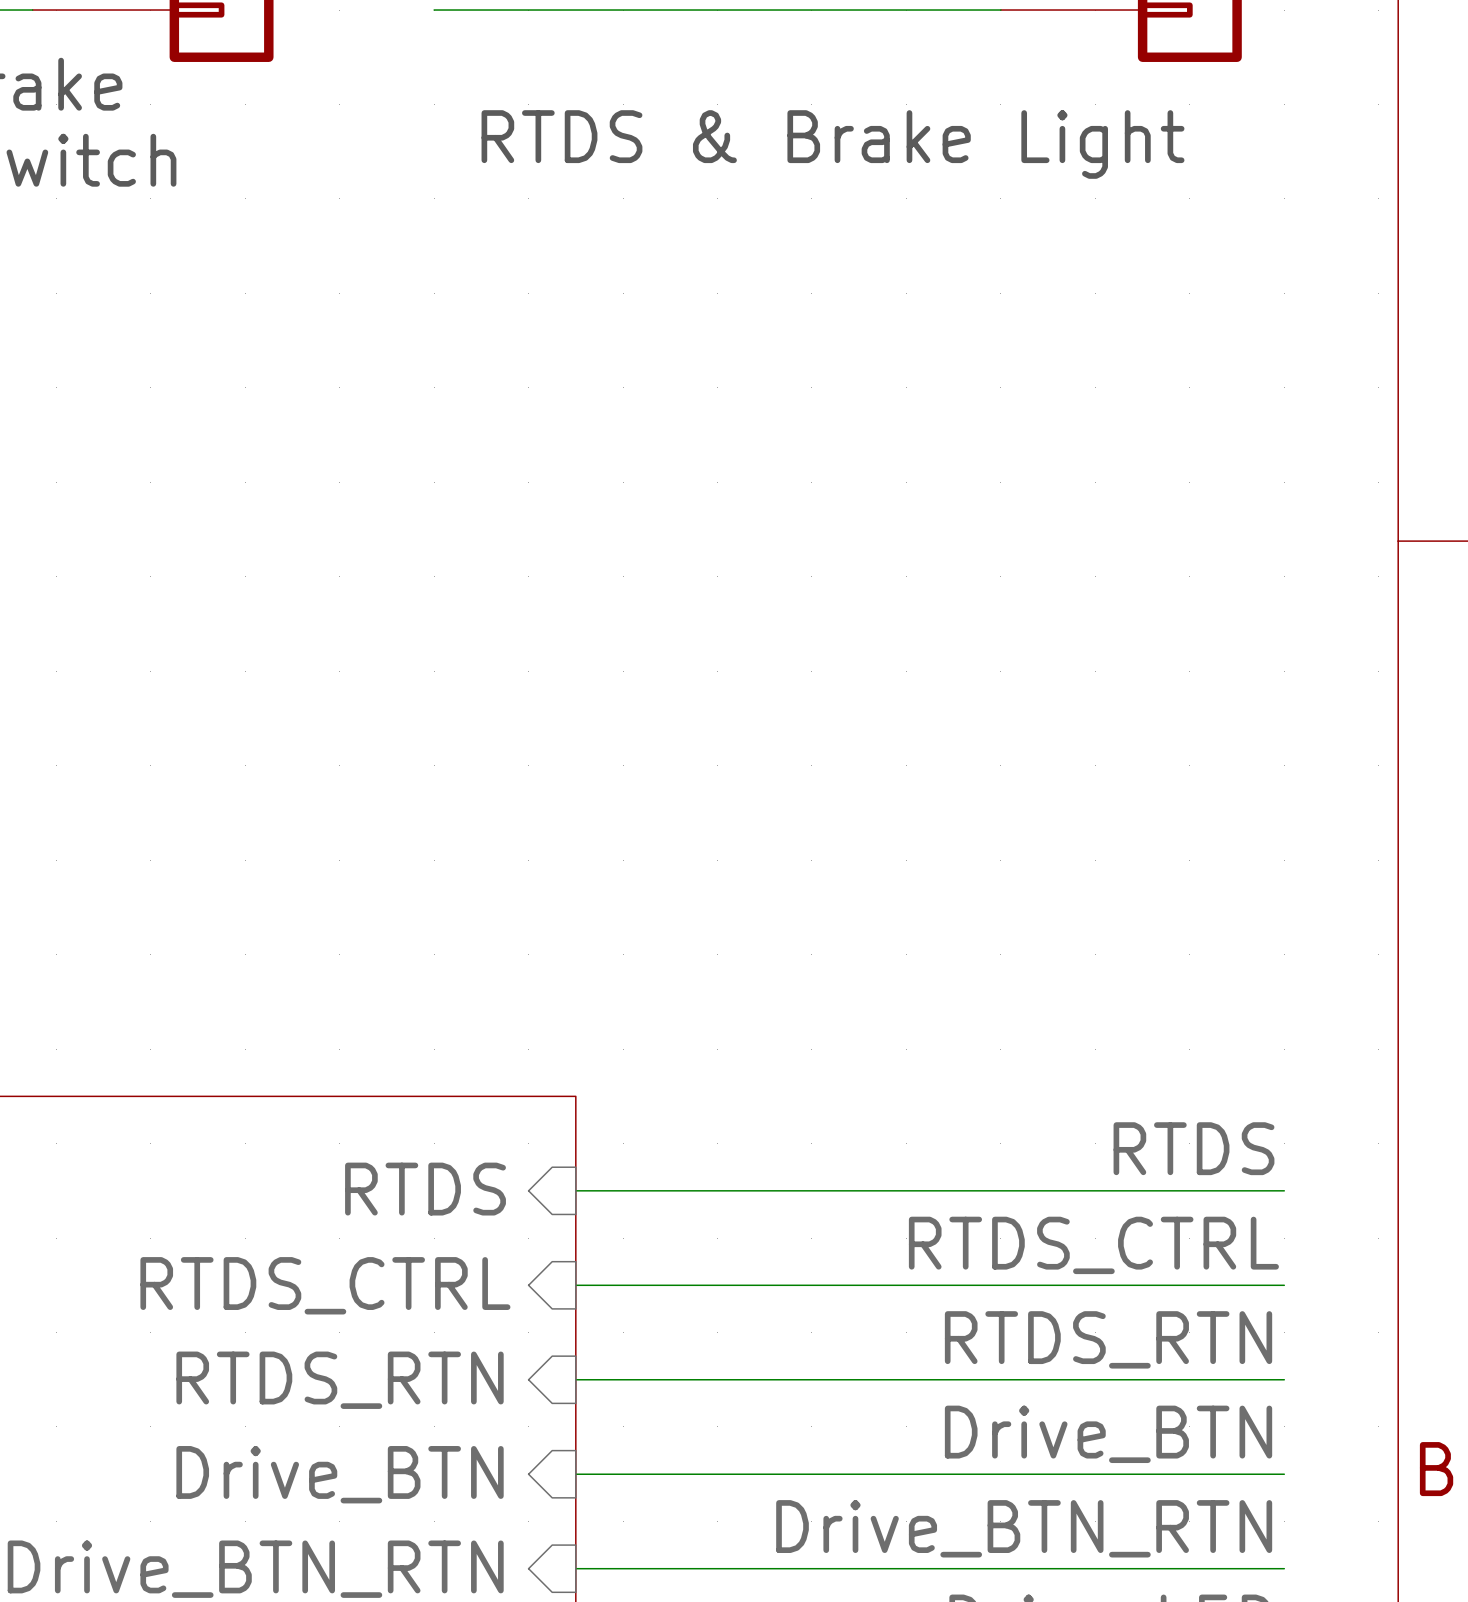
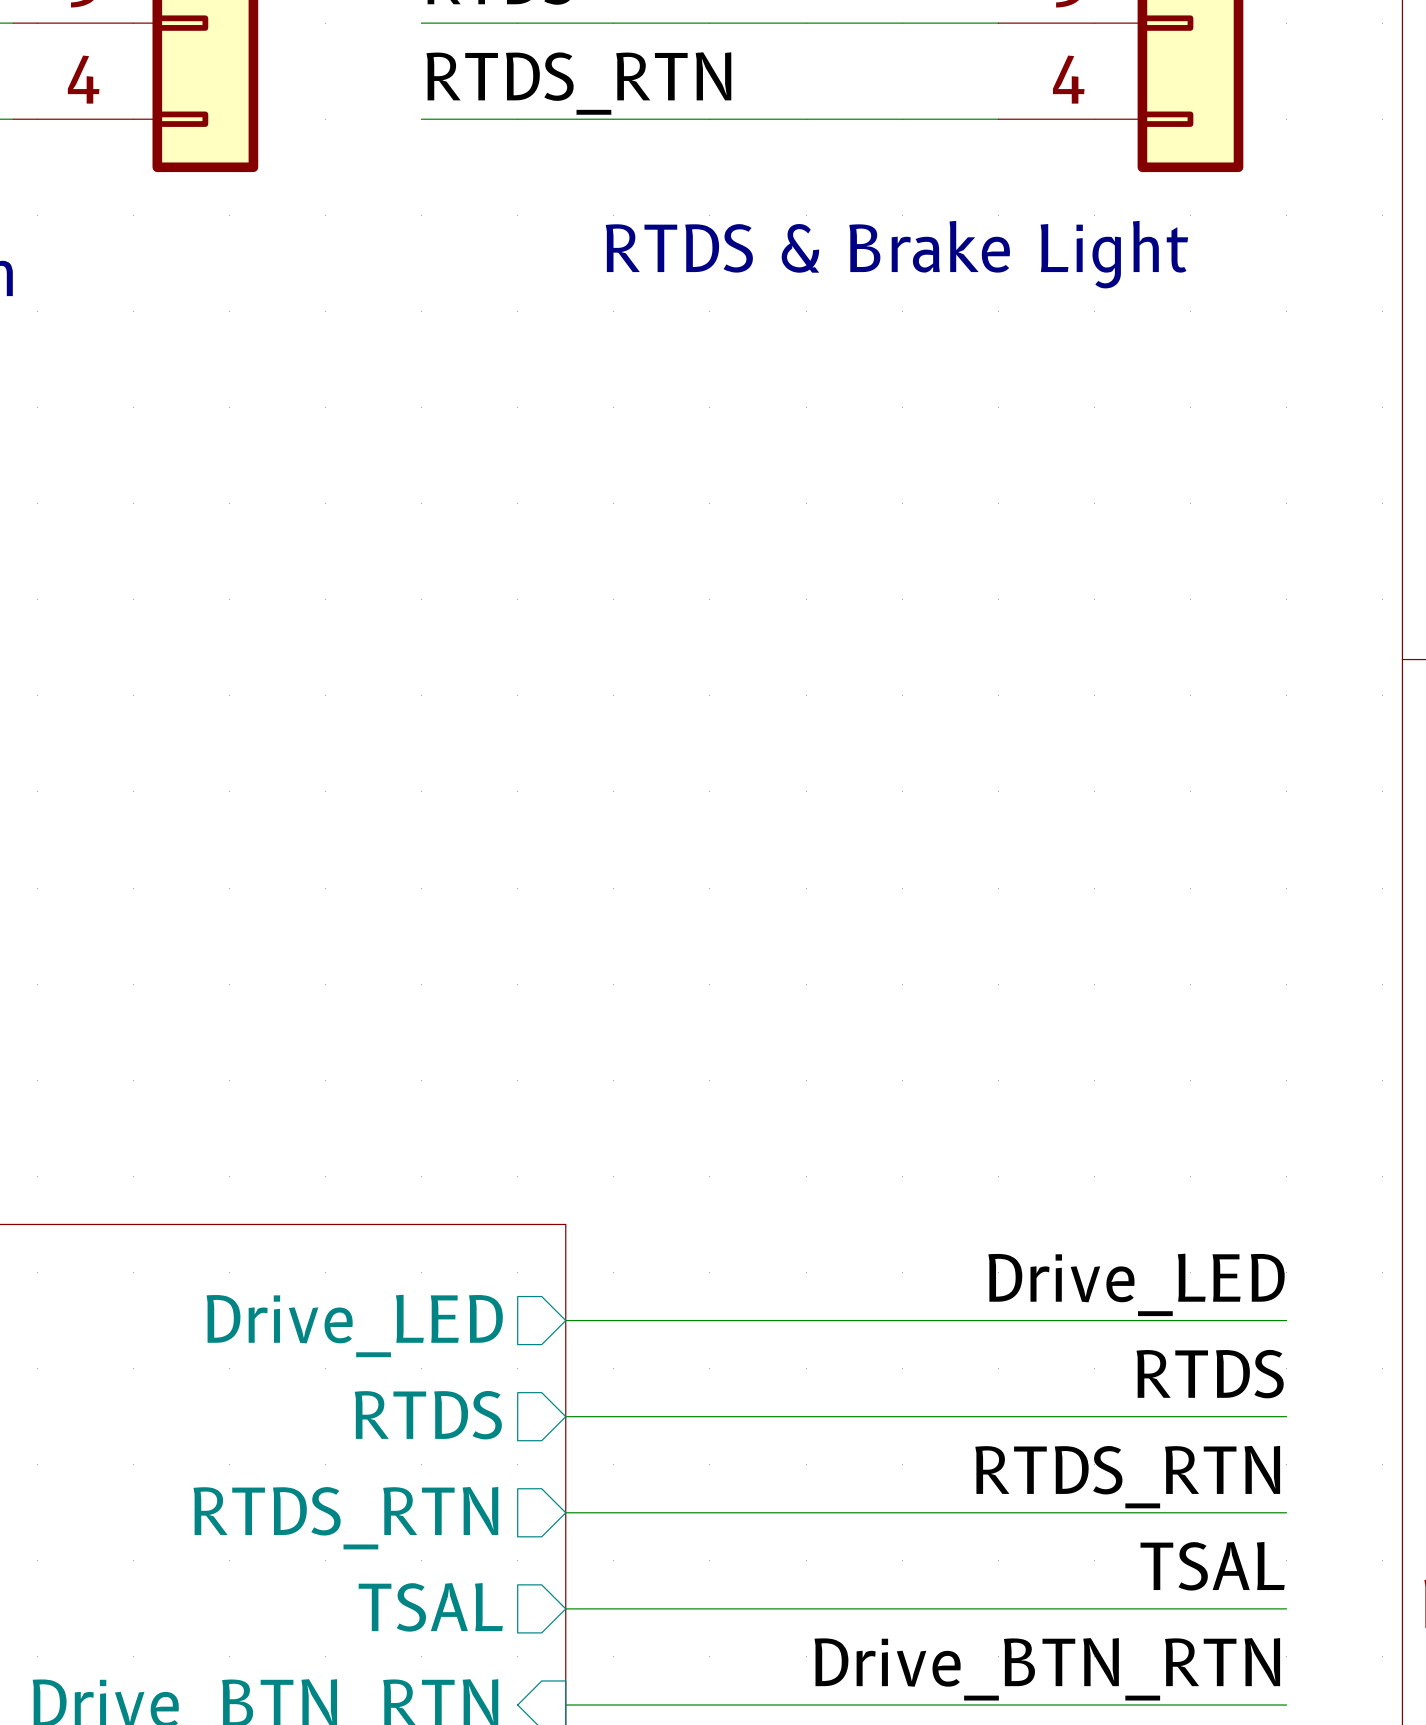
label: RTDS (1193, 1148) -> Drive_LED (1136, 1284)
sheet pin shape: input (425, 1189) -> output (354, 1325)
sheet pin: RTDS (425, 1189) -> Drive_LED (354, 1325)
label: RTDS_CTRL (1093, 1245) -> RTDS (1210, 1374)
sheet pin shape: input (325, 1285) -> output (428, 1415)
sheet pin: RTDS_CTRL (325, 1285) -> RTDS (428, 1415)
sheet pin shape: input (340, 1380) -> output (345, 1518)
label: Drive_BTN (1108, 1434) -> TSAL (1212, 1566)
sheet pin shape: input (340, 1474) -> output (430, 1607)
sheet pin: Drive_BTN (340, 1474) -> TSAL (430, 1607)

